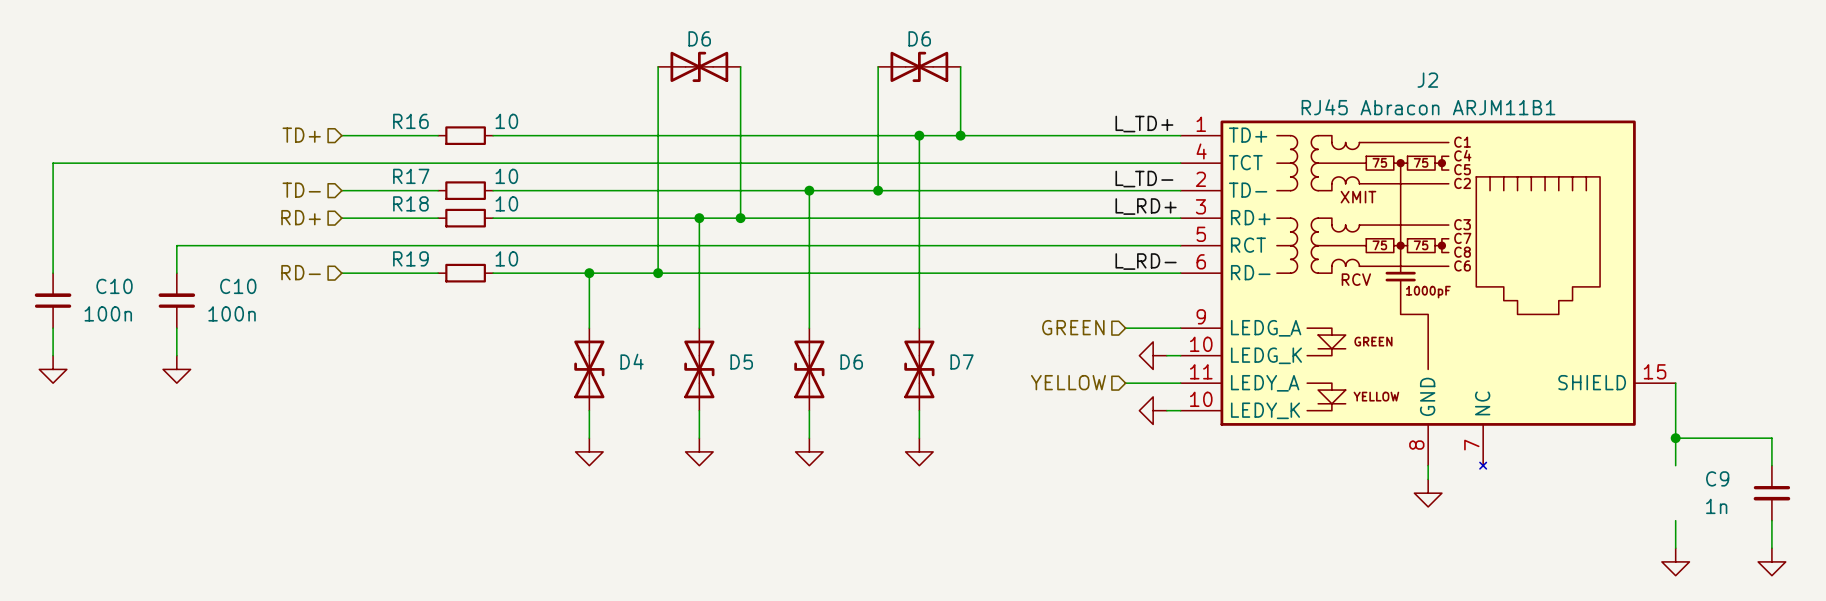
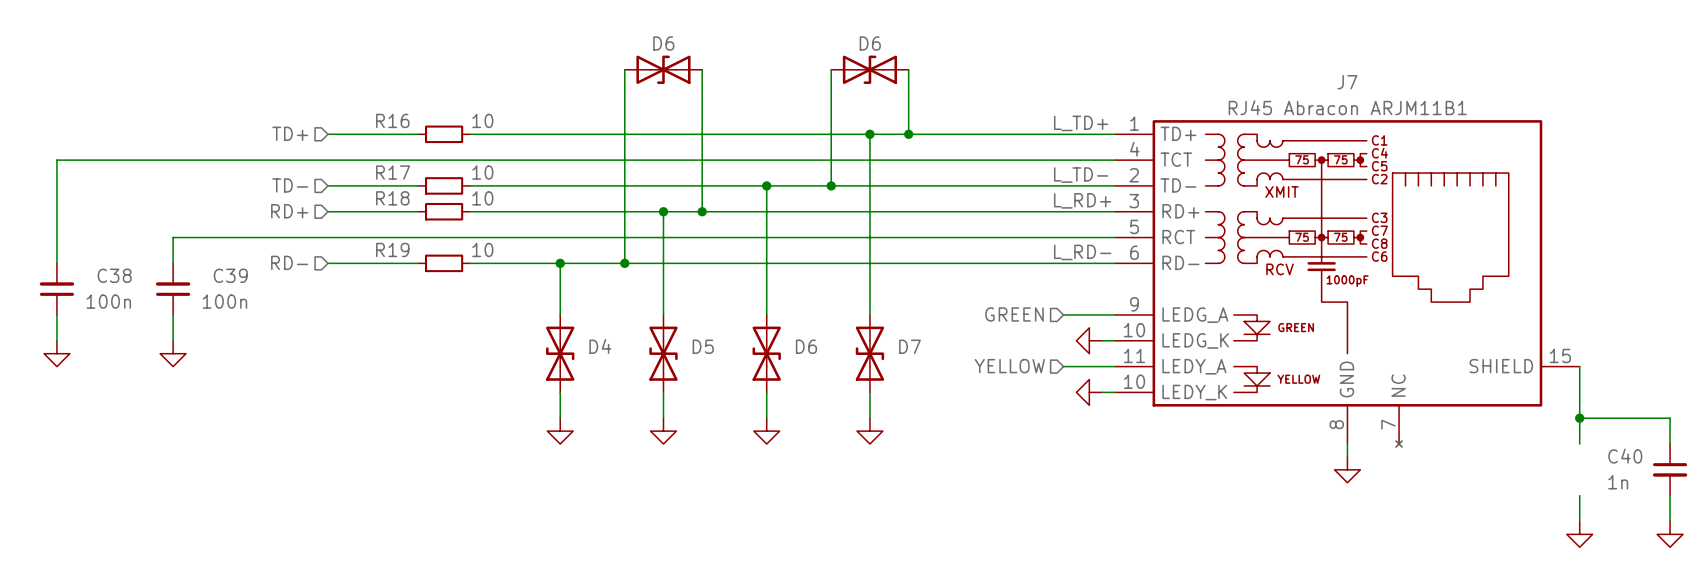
J2 name: J2 (1427, 80) -> J7 (1347, 82)
C10 name: C10 (114, 286) -> C38 (114, 275)
C10 name: C10 (238, 286) -> C39 (230, 275)
C9 name: C9 (1717, 478) -> C40 (1625, 456)

